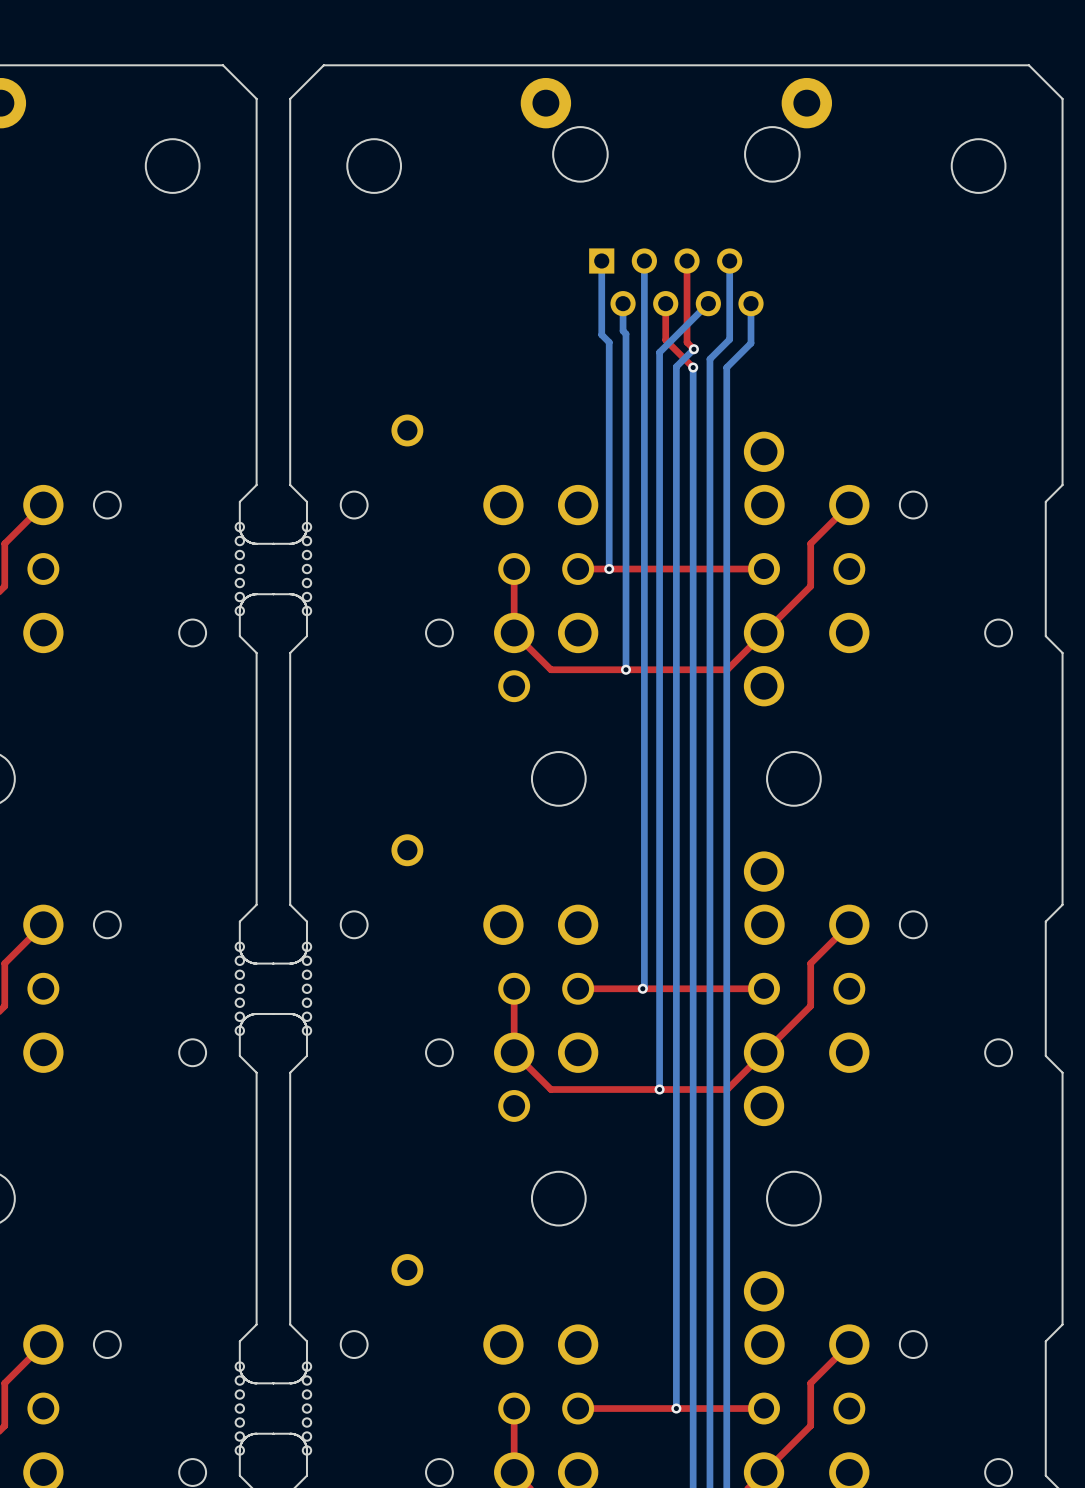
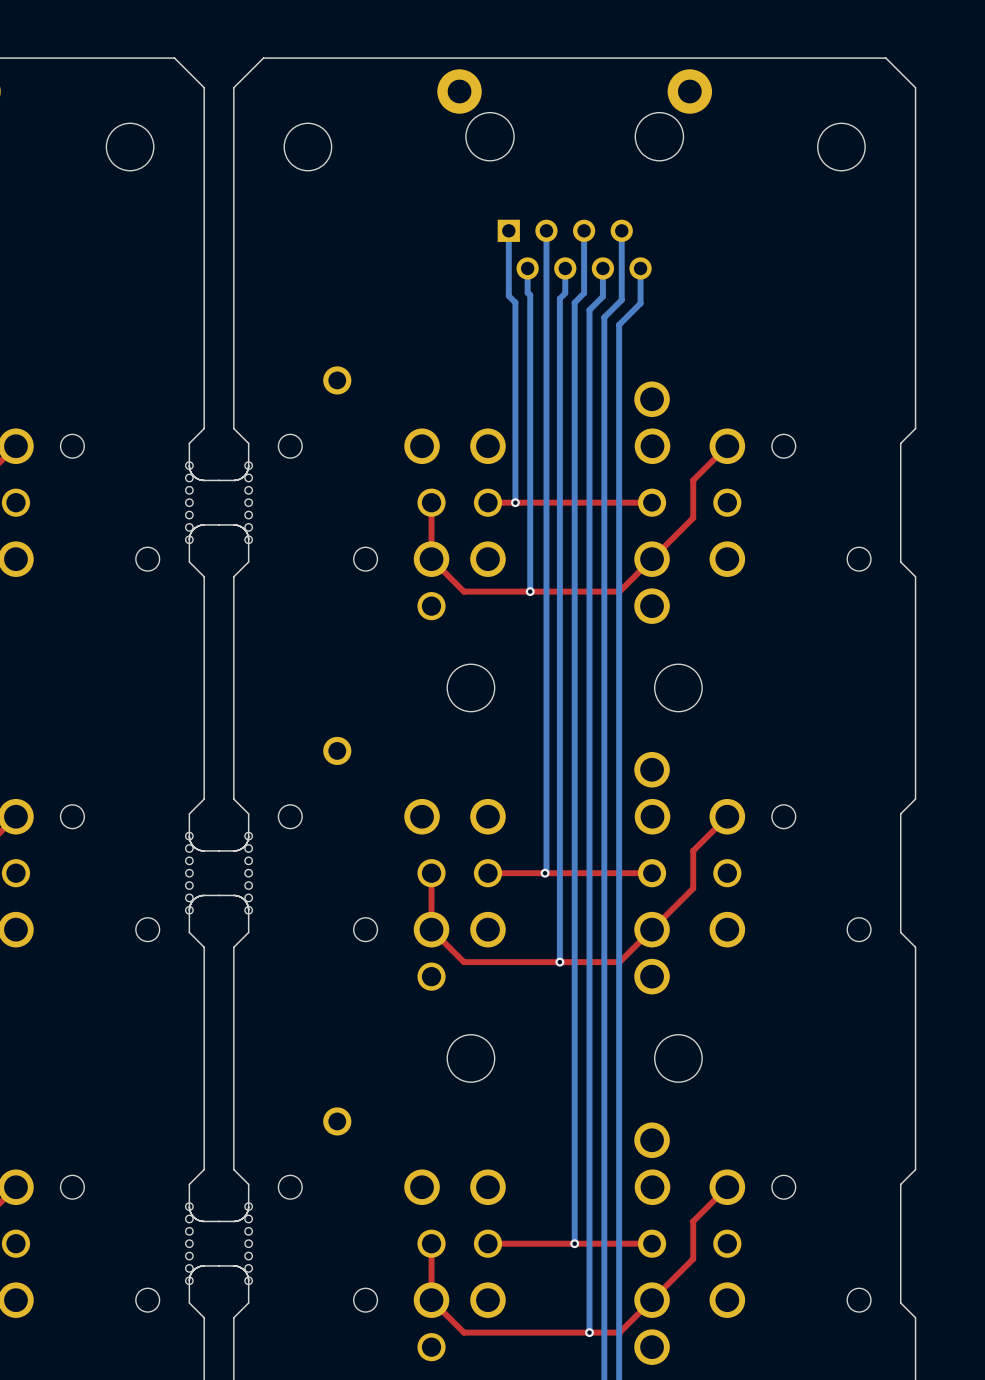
top track: (687, 260) (687, 342) (693, 349) -> none
top track: (665, 303) (665, 340) (693, 367) -> none
bottom track: none -> (565, 268) (565, 293) (559, 298) (559, 311)
bottom track: (708, 303) (659, 352) -> (602, 268) (602, 296) (589, 310) (589, 324)
bottom track: (693, 349) (676, 366) -> (584, 230) (584, 293) (574, 302) (574, 324)
via: (693, 349) -> none
via: (693, 367) -> none

